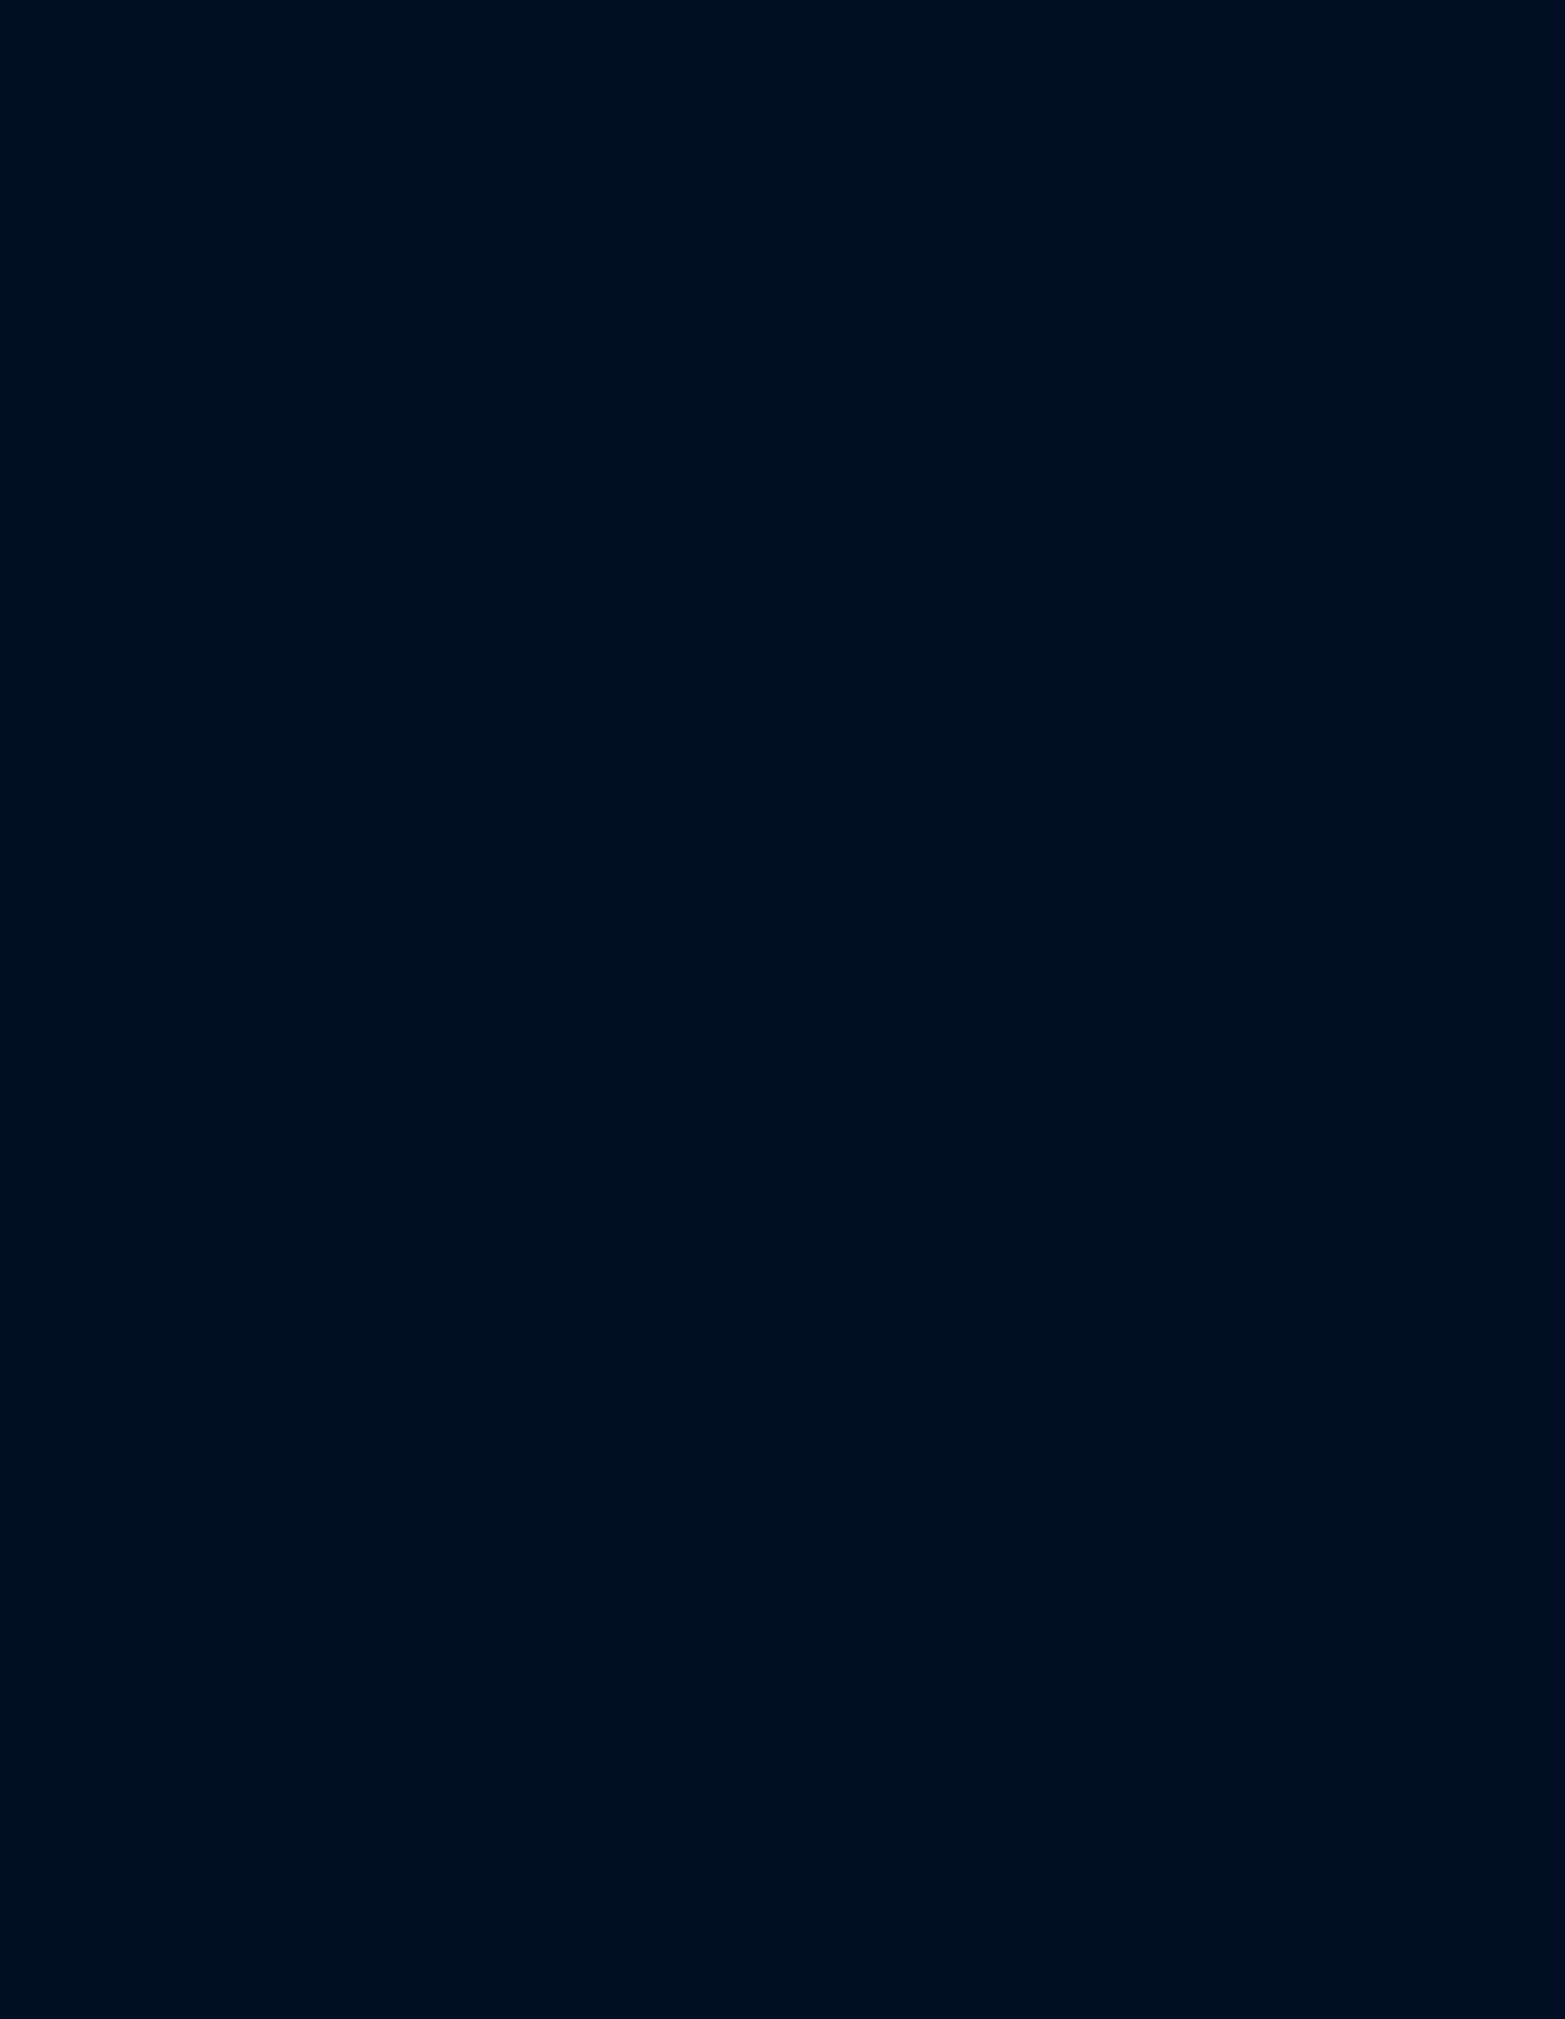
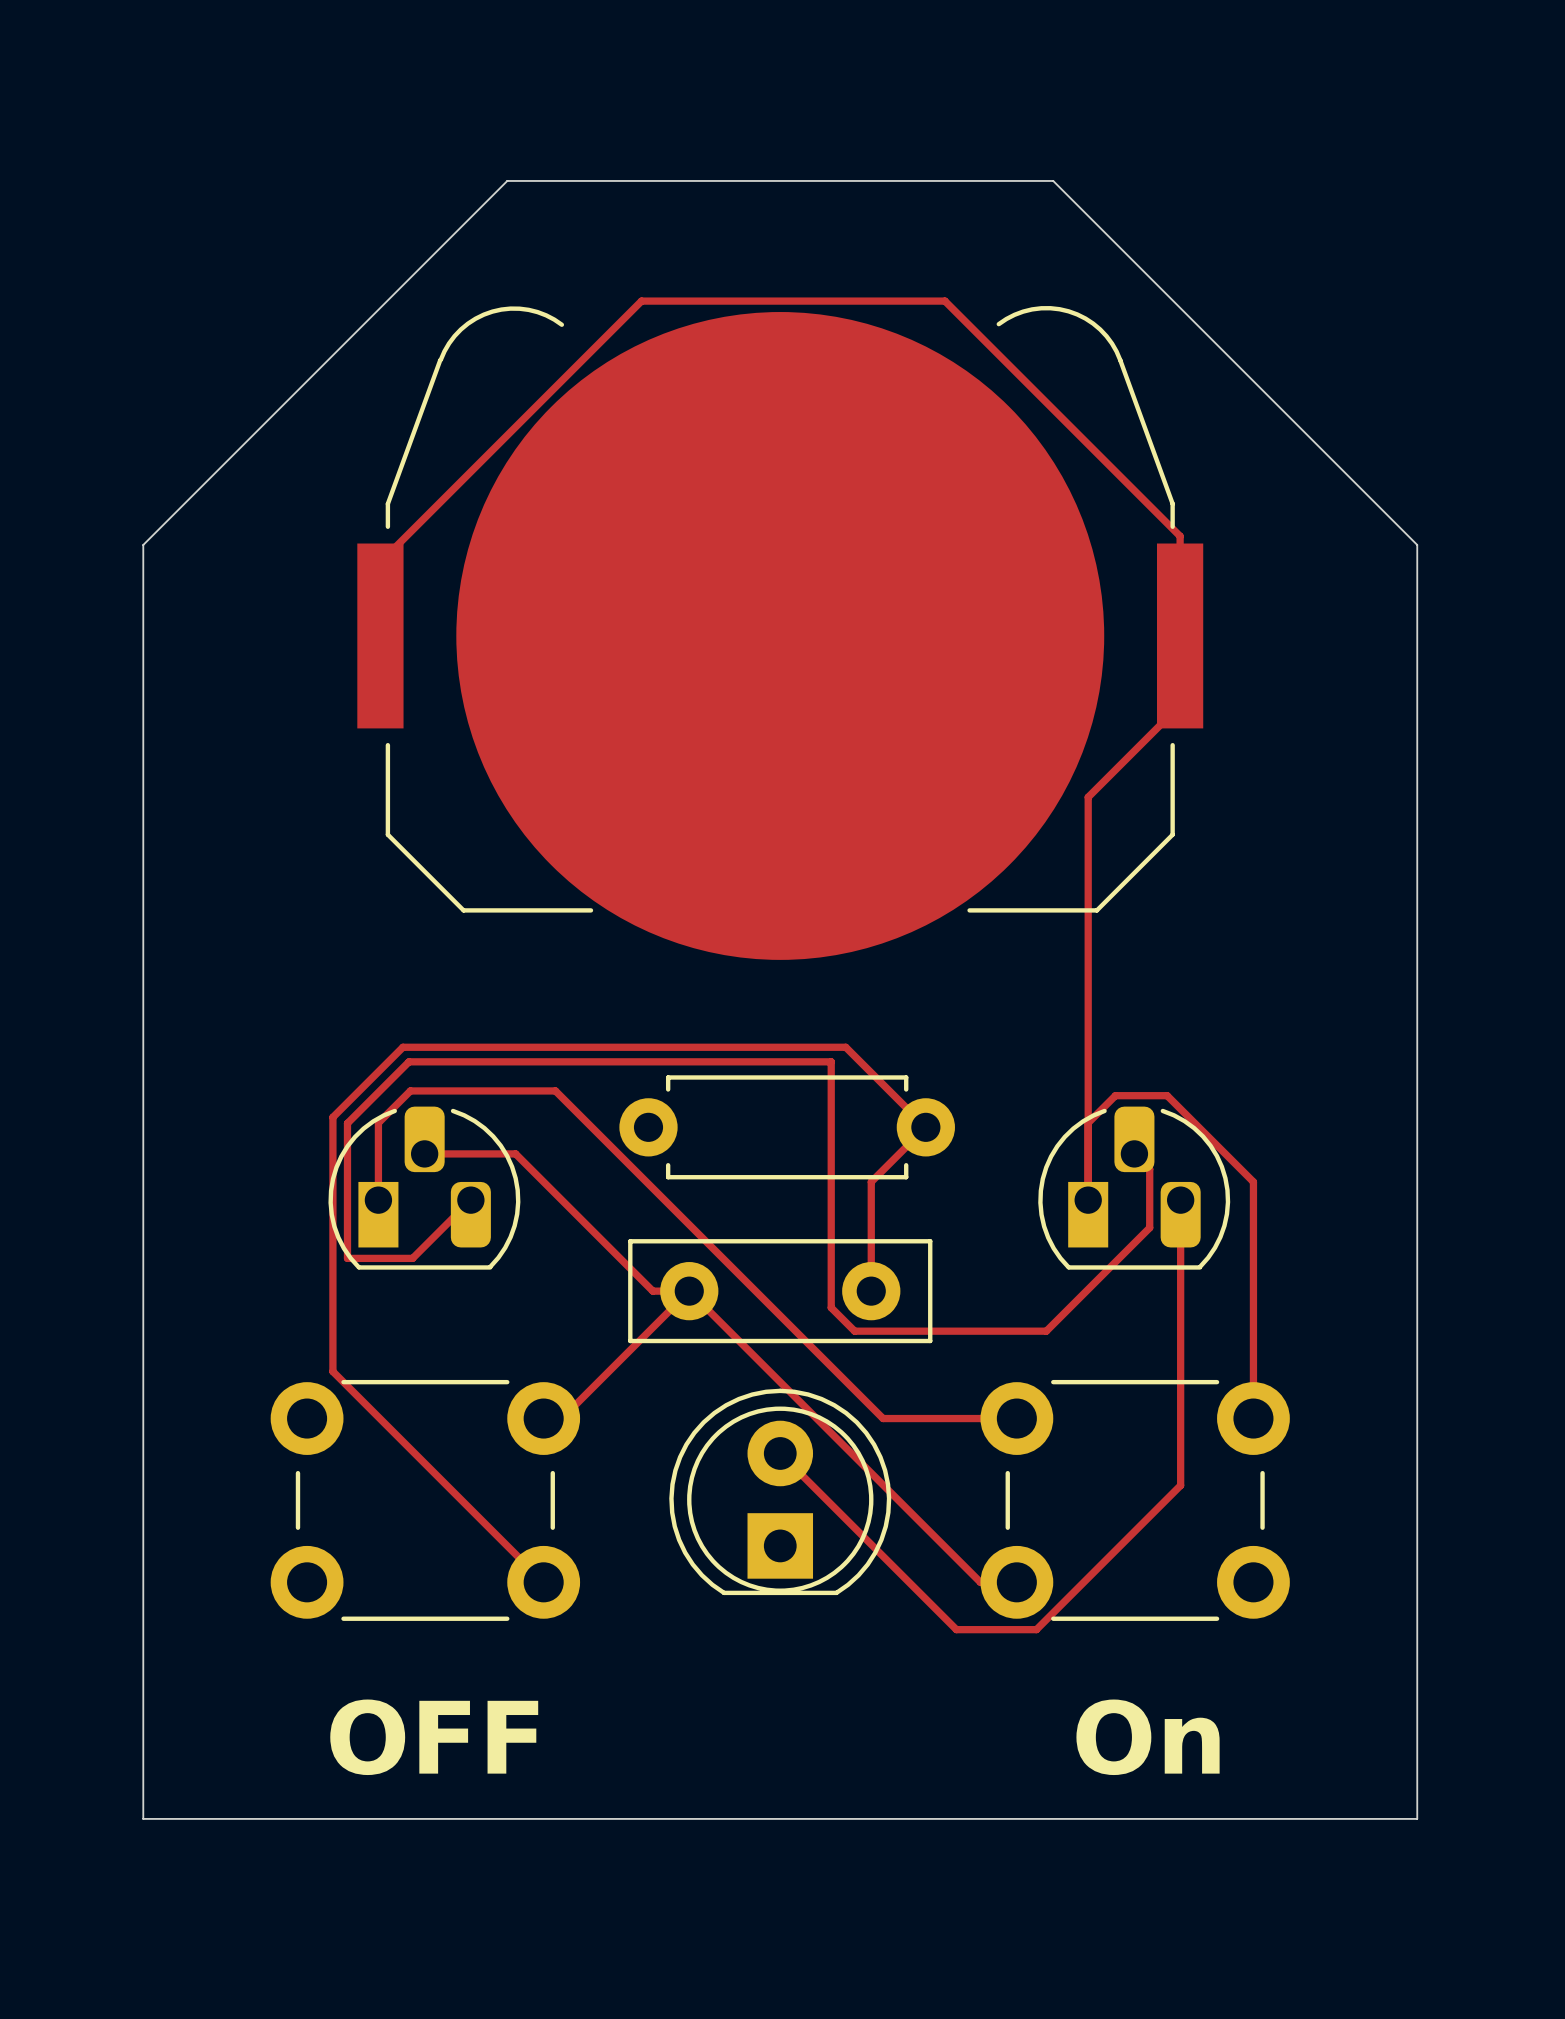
board edge: none -> (507, 180) (143, 544) (143, 1818) (1417, 1818) (1417, 544) (1053, 180) (507, 180)
part: none -> (780, 632)
track: none -> (380, 635) (380, 562) (641, 301) (944, 301) (1180, 536) (1180, 705) (1088, 797) (1088, 1200)
track: none -> (1088, 1122) (1115, 1095) (1167, 1095) (1253, 1181) (1253, 1418)
part: none -> (787, 1127)
track: none -> (424, 1153) (515, 1153) (652, 1291) (689, 1291)
track: none -> (1134, 1153) (1149, 1169) (1149, 1227) (1046, 1331) (854, 1331) (831, 1307) (831, 1061) (409, 1061) (347, 1123) (347, 1258) (412, 1258) (470, 1200)
part: none -> (424, 1188)
part: none -> (1134, 1188)
track: none -> (378, 1200) (378, 1122) (410, 1090) (555, 1090) (883, 1418) (1016, 1418)
track: none -> (1180, 1200) (1180, 1485) (1036, 1629) (956, 1629) (780, 1453)
track: none -> (689, 1291) (980, 1582) (1016, 1582)
track: none -> (689, 1291) (561, 1418) (543, 1418)
part: none -> (780, 1291)
track: none -> (871, 1291) (871, 1181) (925, 1127) (845, 1047) (402, 1047) (332, 1117) (332, 1371) (543, 1582)
part: none -> (780, 1491)
part: none -> (425, 1500)
part: none -> (1135, 1500)
text: none -> OFF (434, 1737)
text: none -> On (1148, 1737)

